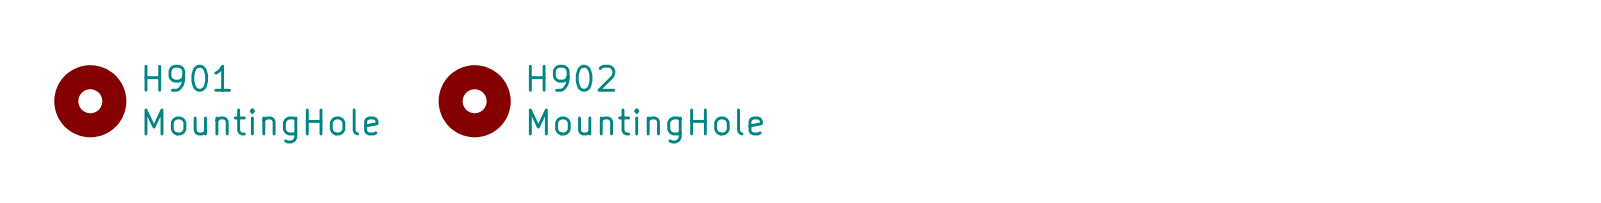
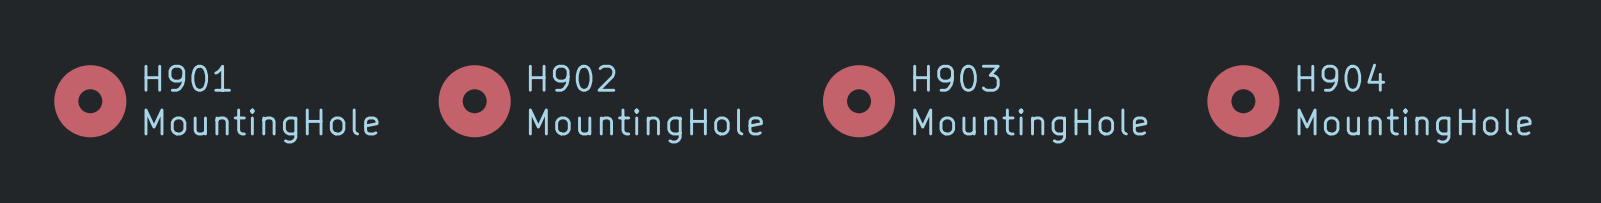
H903: none -> MountingHole (859, 101)
H904: none -> MountingHole (1243, 101)

